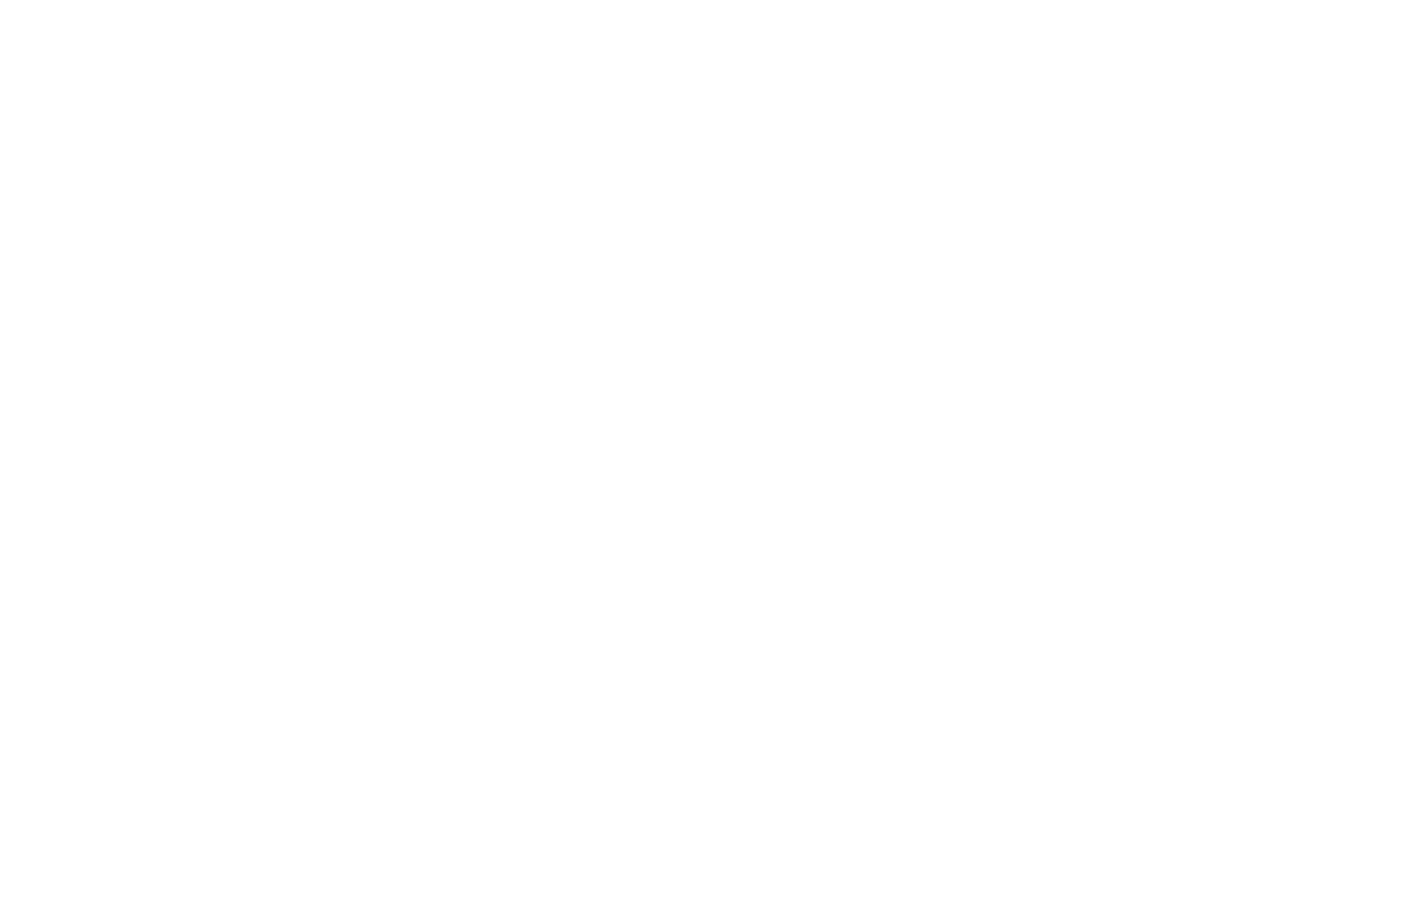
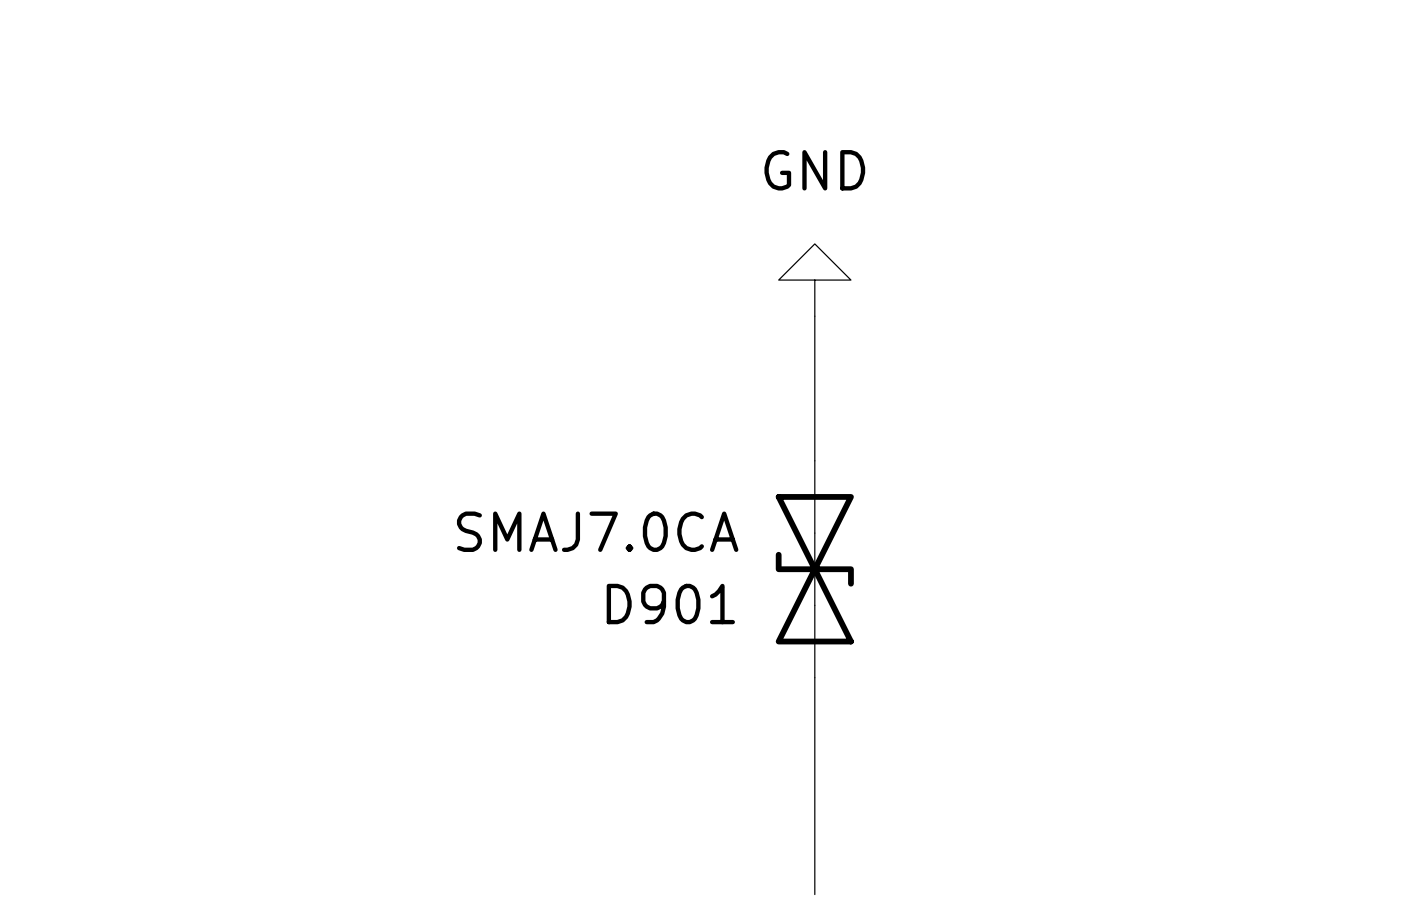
power symbol: none -> GND (814, 280)
wire: none -> (814, 316) (814, 460)
D901: none -> SMAJ7.0CA (814, 569)
wire: none -> (814, 677) (814, 894)

